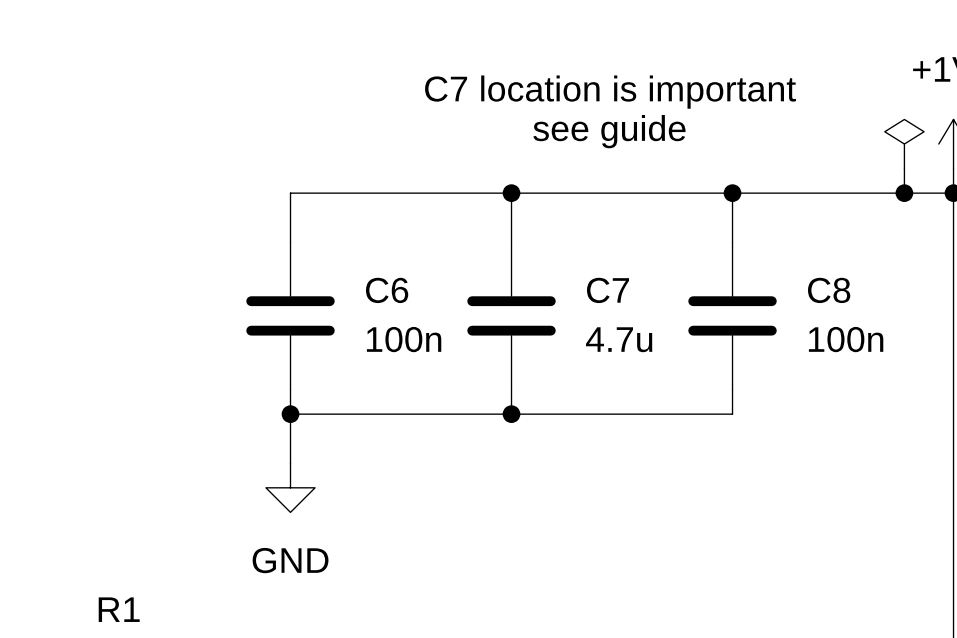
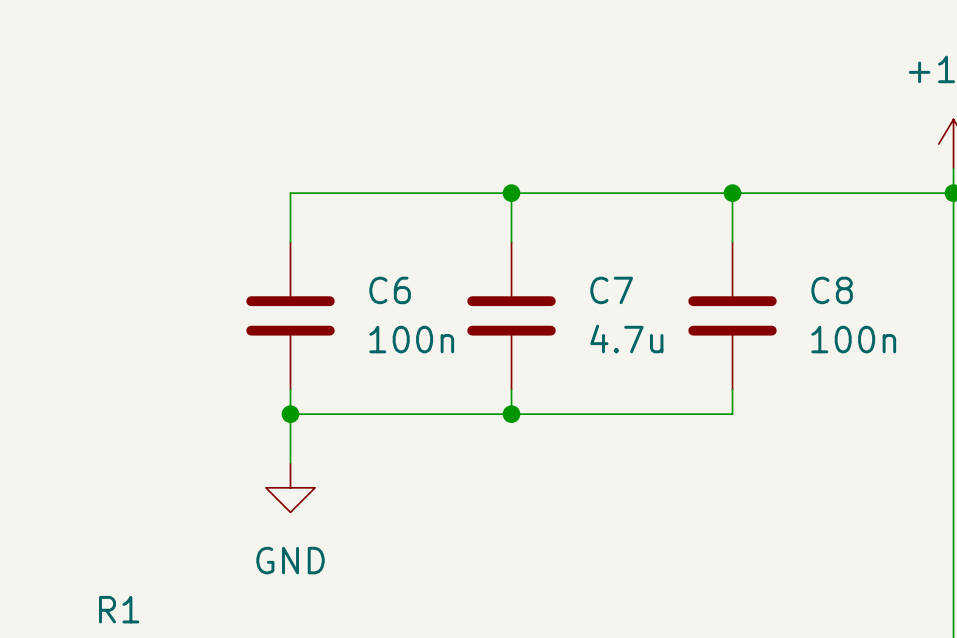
text: C7 location is important (610, 92) -> none
text: see guide (609, 131) -> none
power symbol: (904, 144) -> none
wire: (904, 168) (904, 193) -> none
junction: (904, 193) -> none

